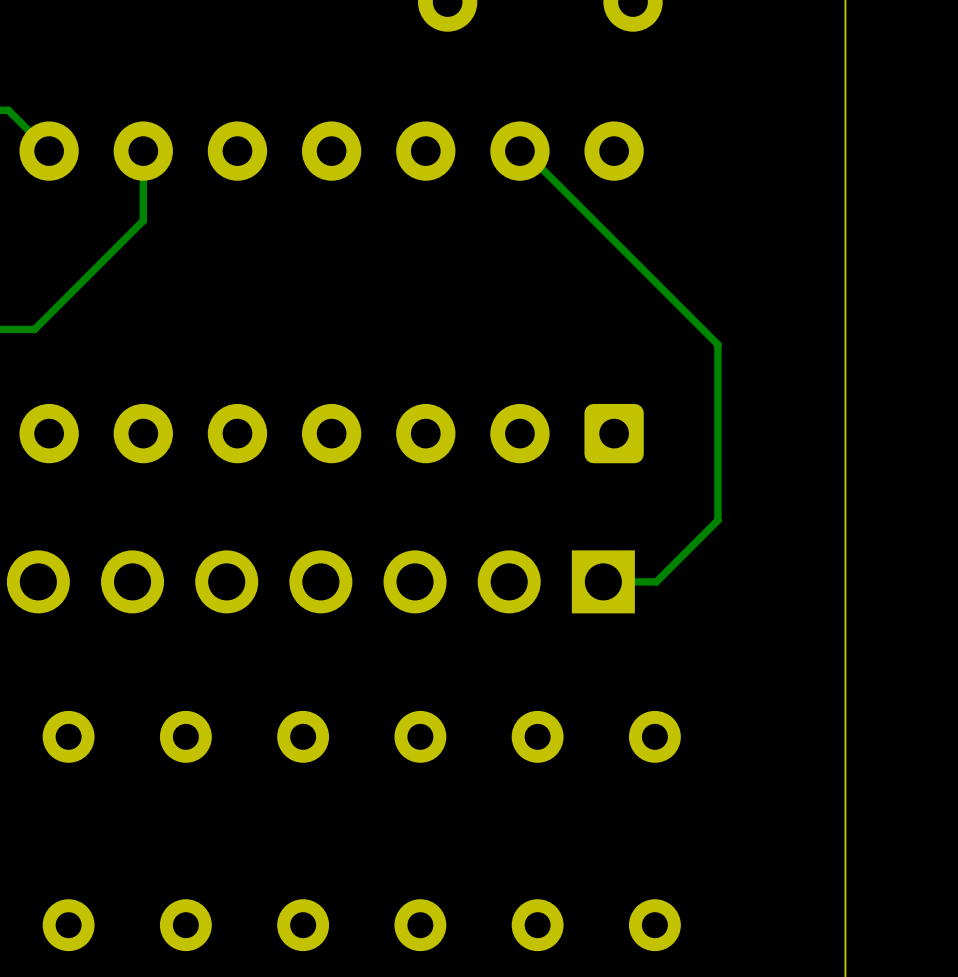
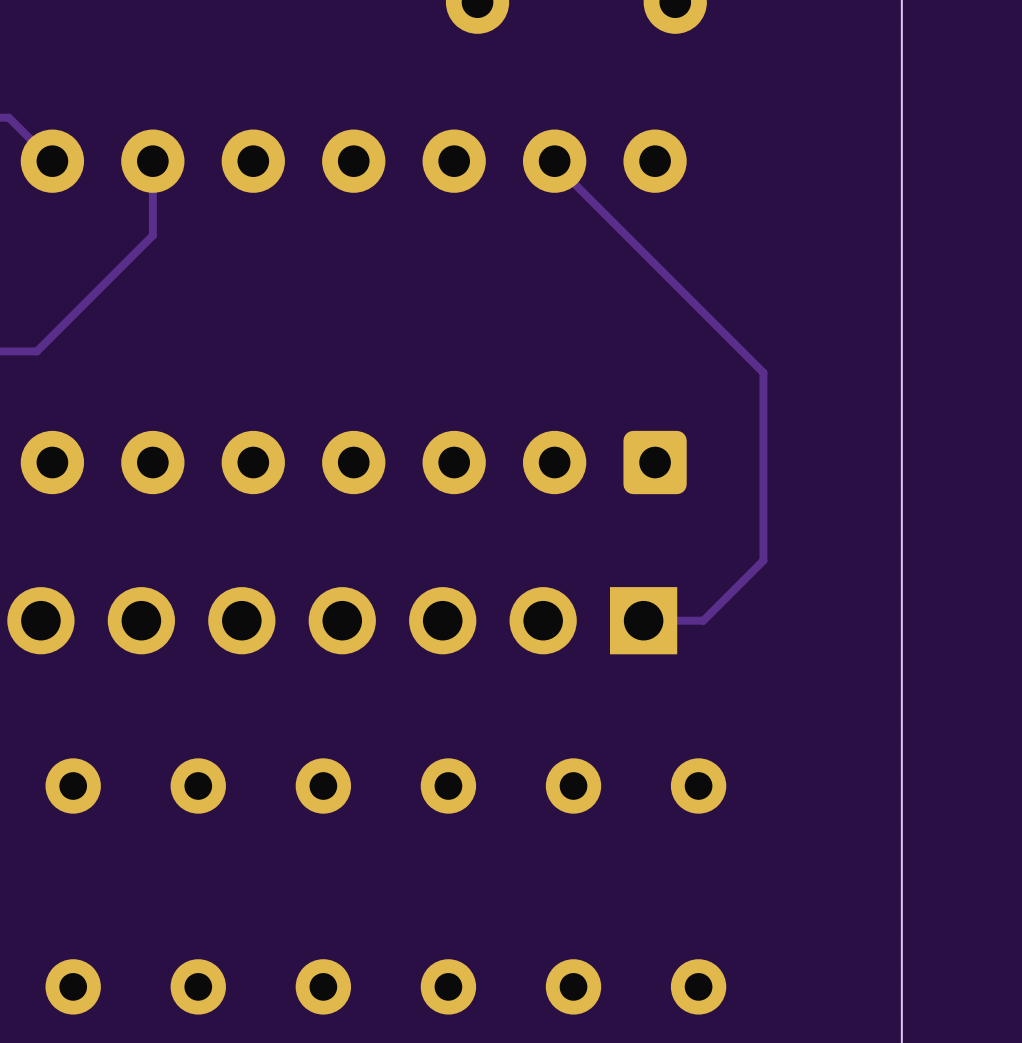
track: (519, 151) (524, 151) (717, 344) (717, 520) (656, 581) -> (554, 145) (554, 163) (763, 372) (763, 560) (703, 620) (700, 620)

